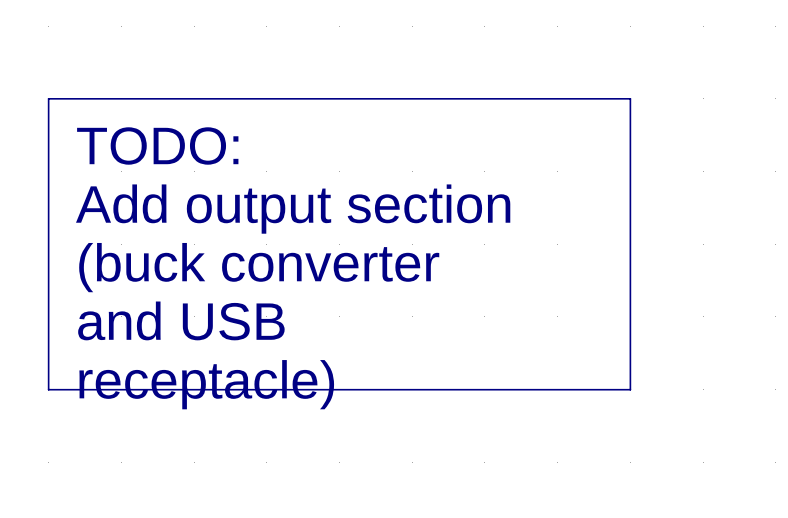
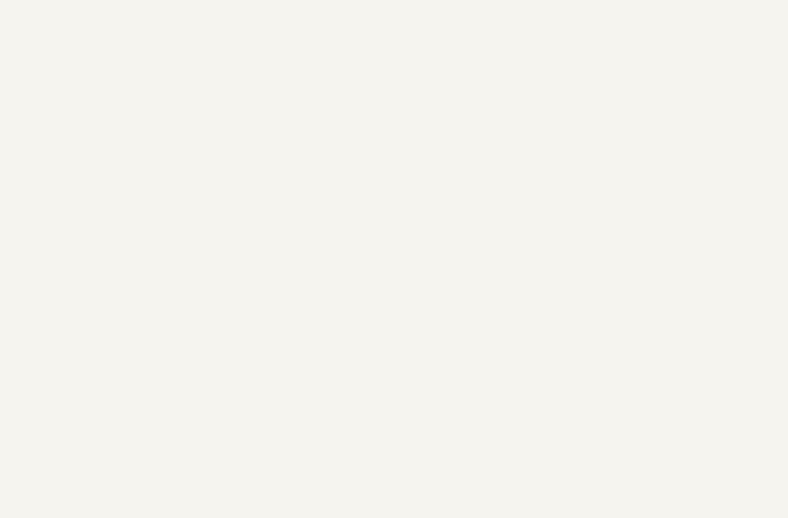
line: (48, 98) (630, 98) (630, 389) (48, 389) (48, 98) -> none
text: TODO: (157, 146) -> none
text: Add output section (293, 209) -> none
text: (buck converter (259, 267) -> none
text: and USB (181, 320) -> none
text: receptacle) (206, 384) -> none

